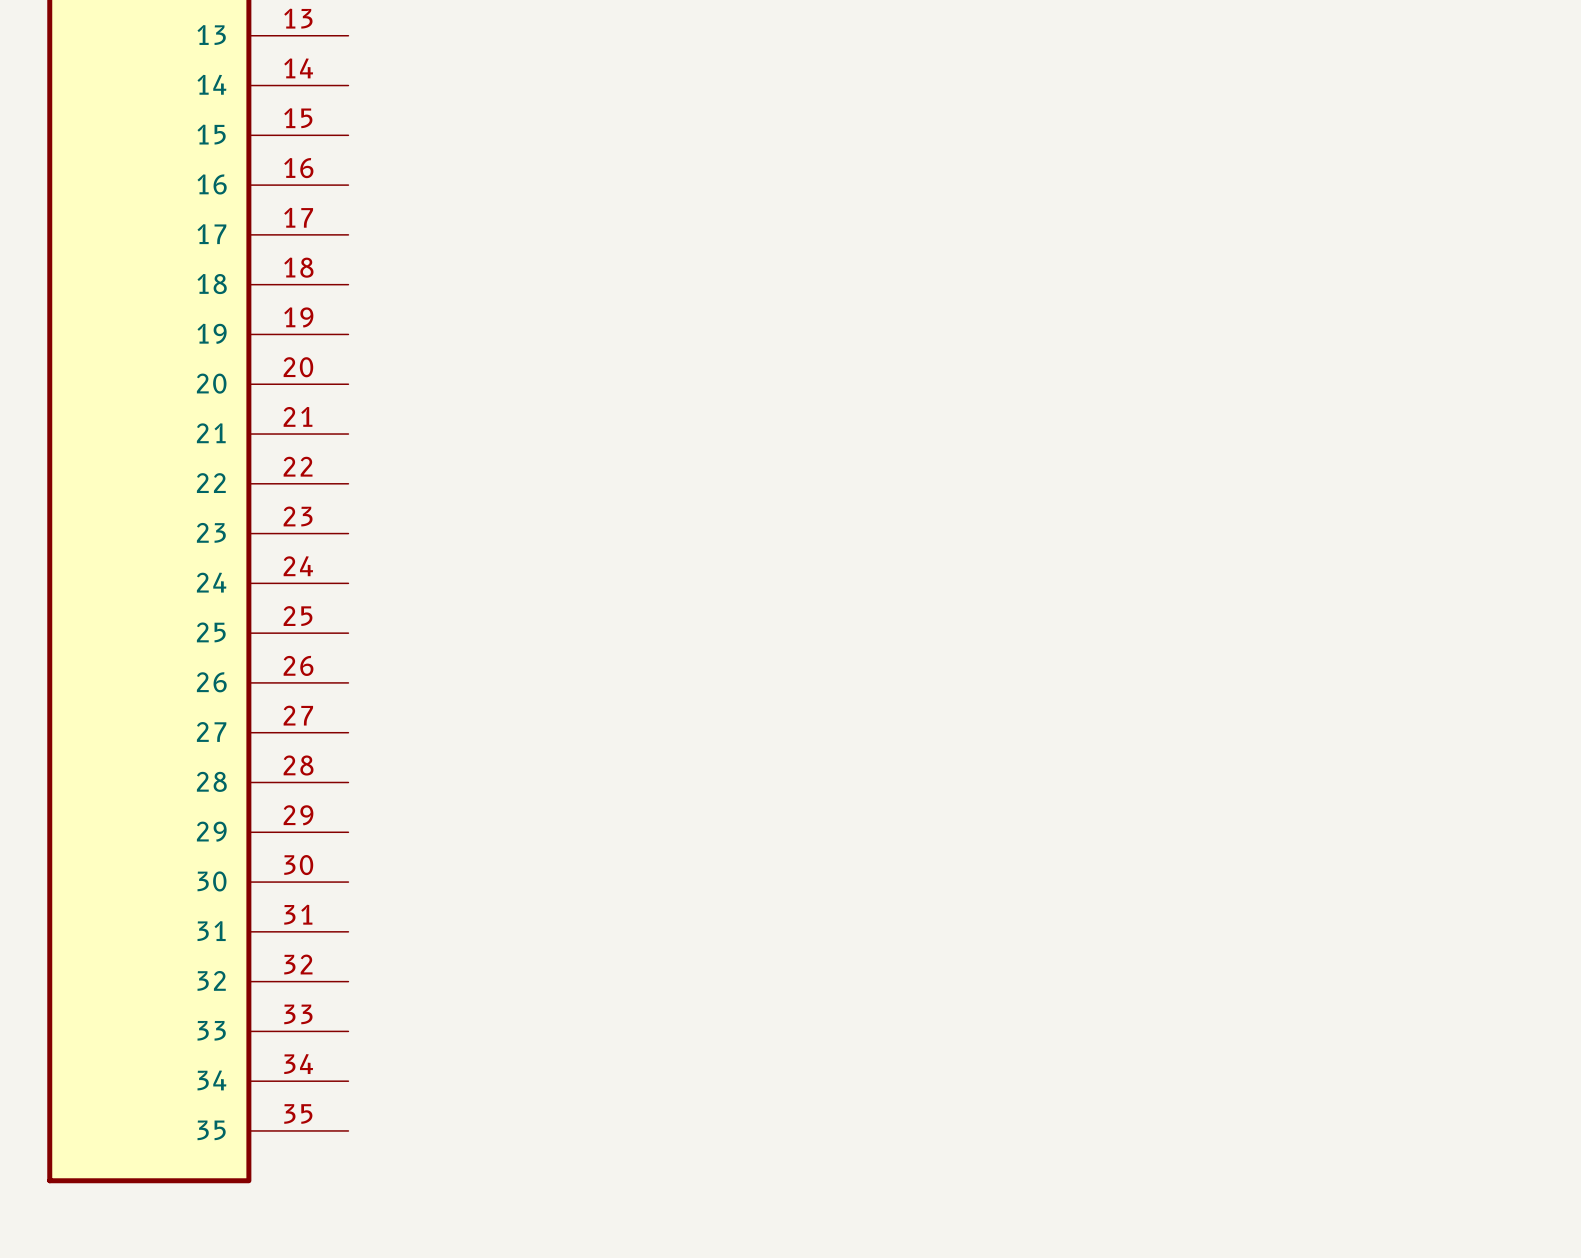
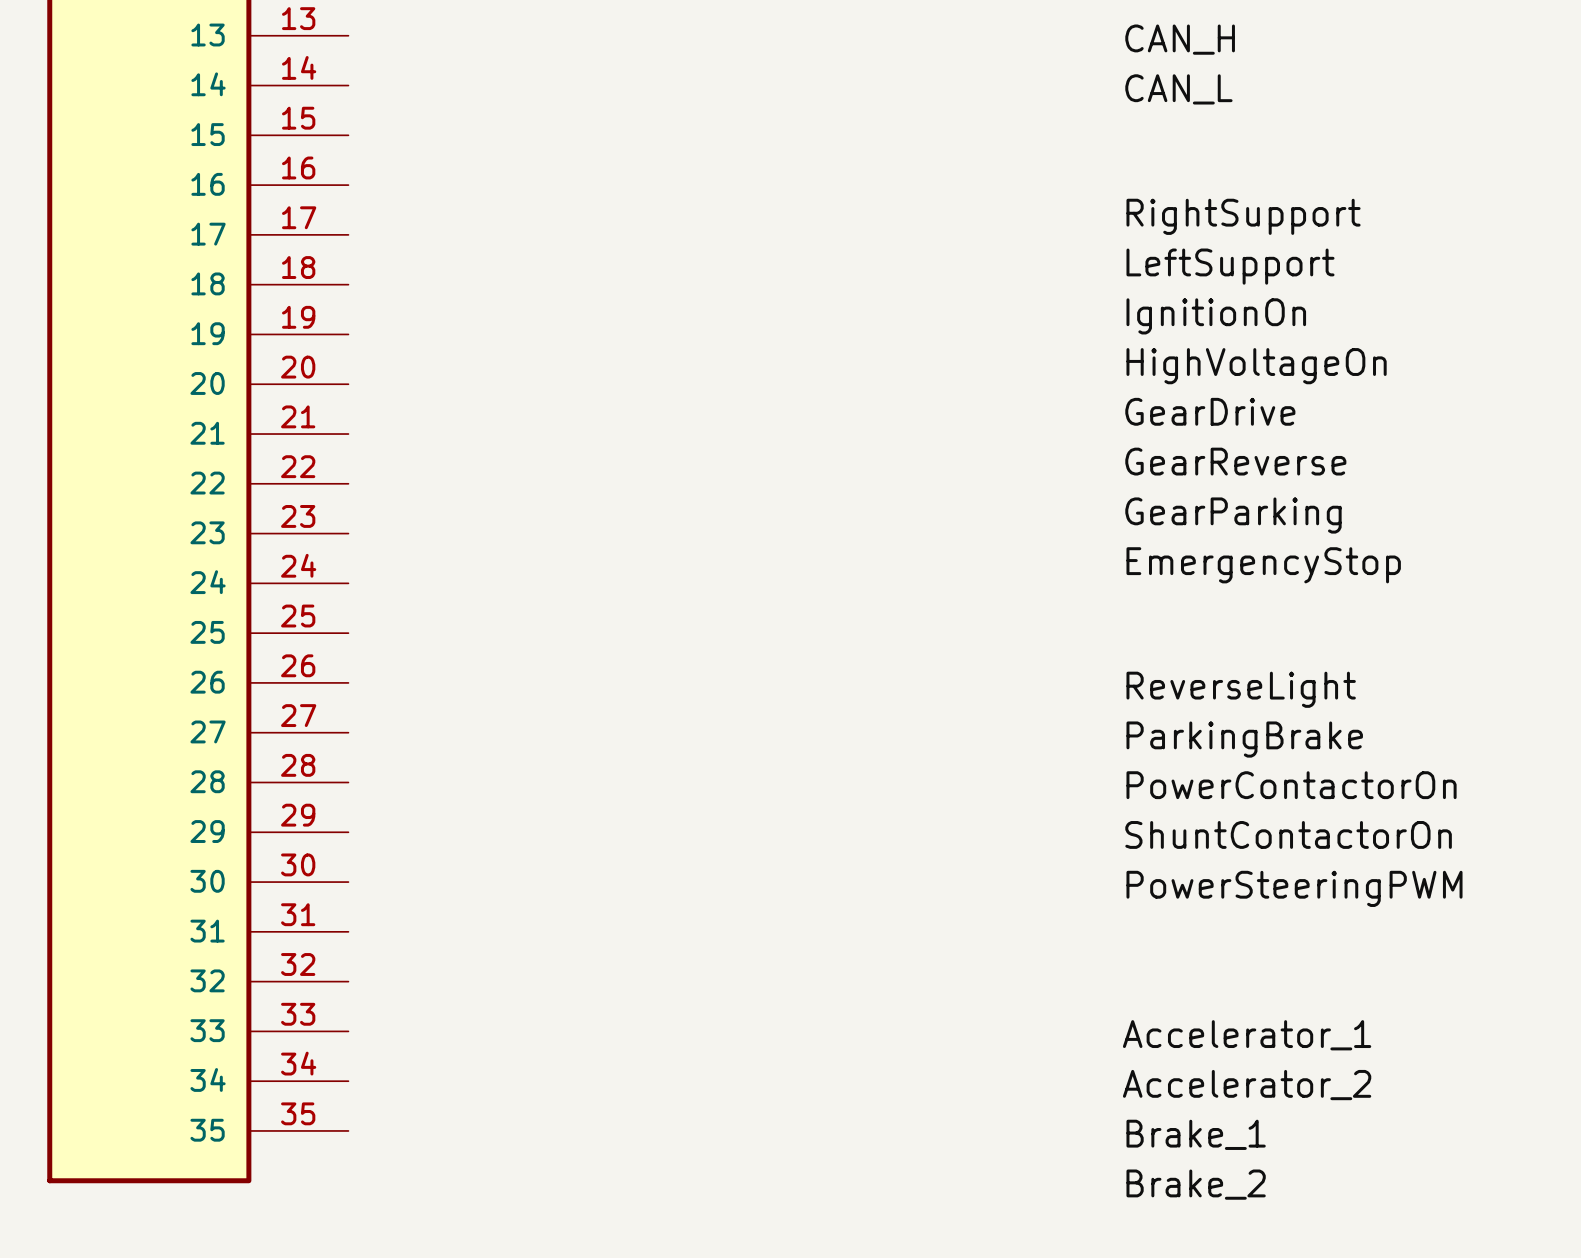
label: none -> CAN_H (1180, 39)
label: none -> CAN_L (1178, 89)
label: none -> RightSupport (1243, 216)
label: none -> LeftSupport (1230, 266)
label: none -> IgnitionOn (1216, 316)
label: none -> HighVoltageOn (1256, 366)
label: none -> GearDrive (1210, 411)
label: none -> GearReverse (1235, 461)
label: none -> GearParking (1233, 515)
label: none -> EmergencyStop (1263, 565)
label: none -> ReverseLight (1241, 689)
label: none -> ParkingBrake (1244, 739)
label: none -> PowerContactorOn (1291, 785)
label: none -> ShuntContactorOn (1288, 834)
label: none -> PowerSteeringPWM (1294, 888)
label: none -> Accelerator_1 (1247, 1035)
label: none -> Accelerator_2 (1247, 1085)
label: none -> Brake_1 (1196, 1134)
label: none -> Brake_2 (1196, 1184)

